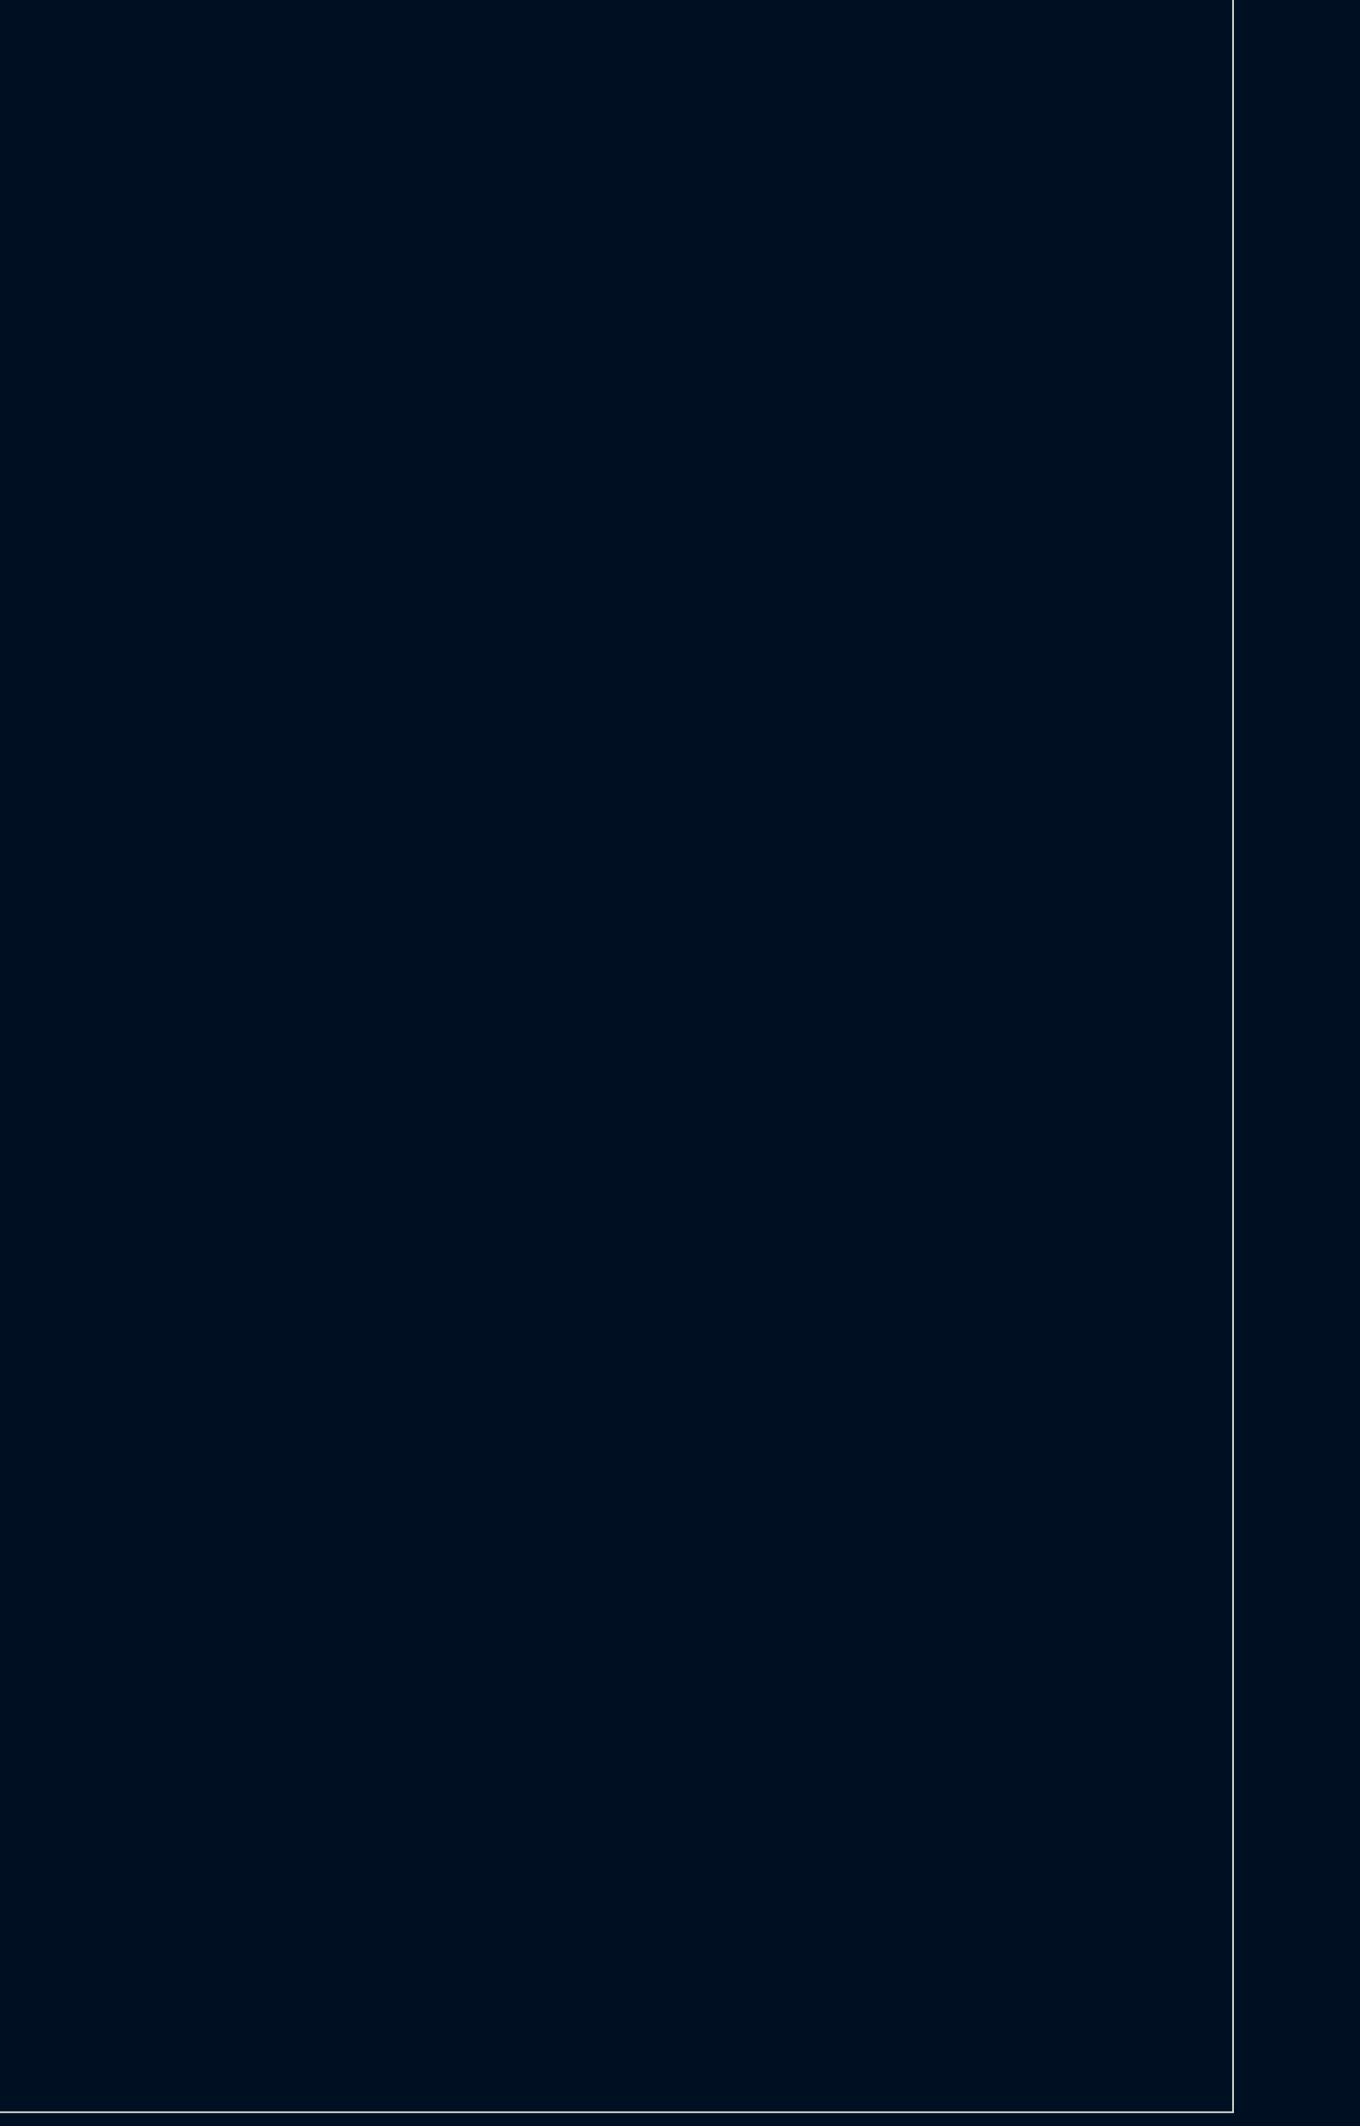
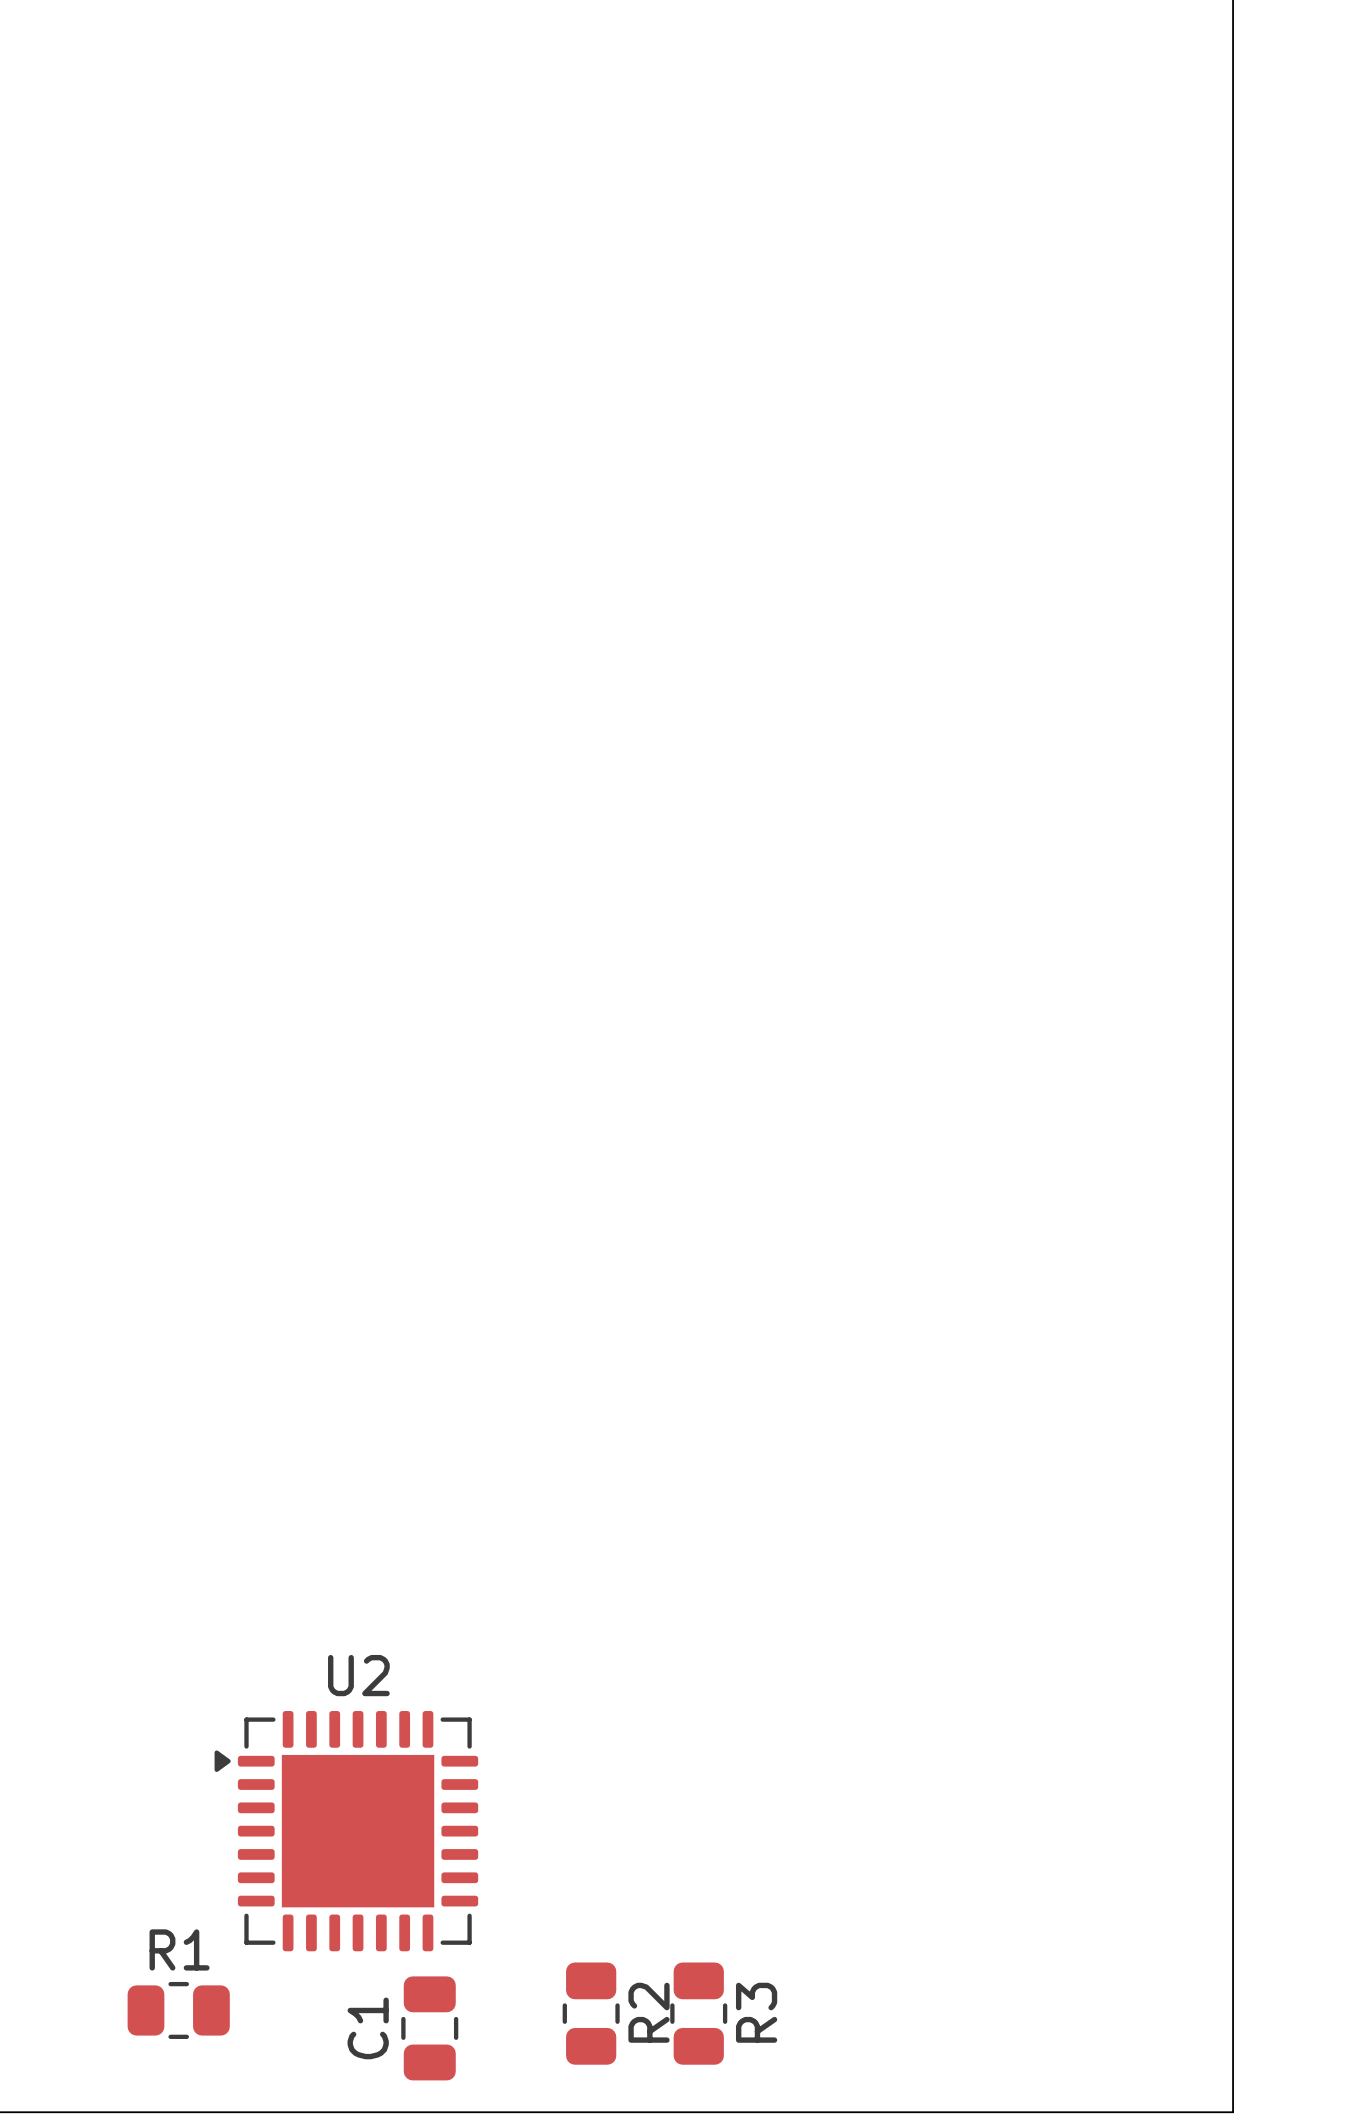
U2: none -> (346, 1831)
R1: none -> (178, 2010)
R2: none -> (591, 2013)
R3: none -> (698, 2013)
C1: none -> (429, 2028)

